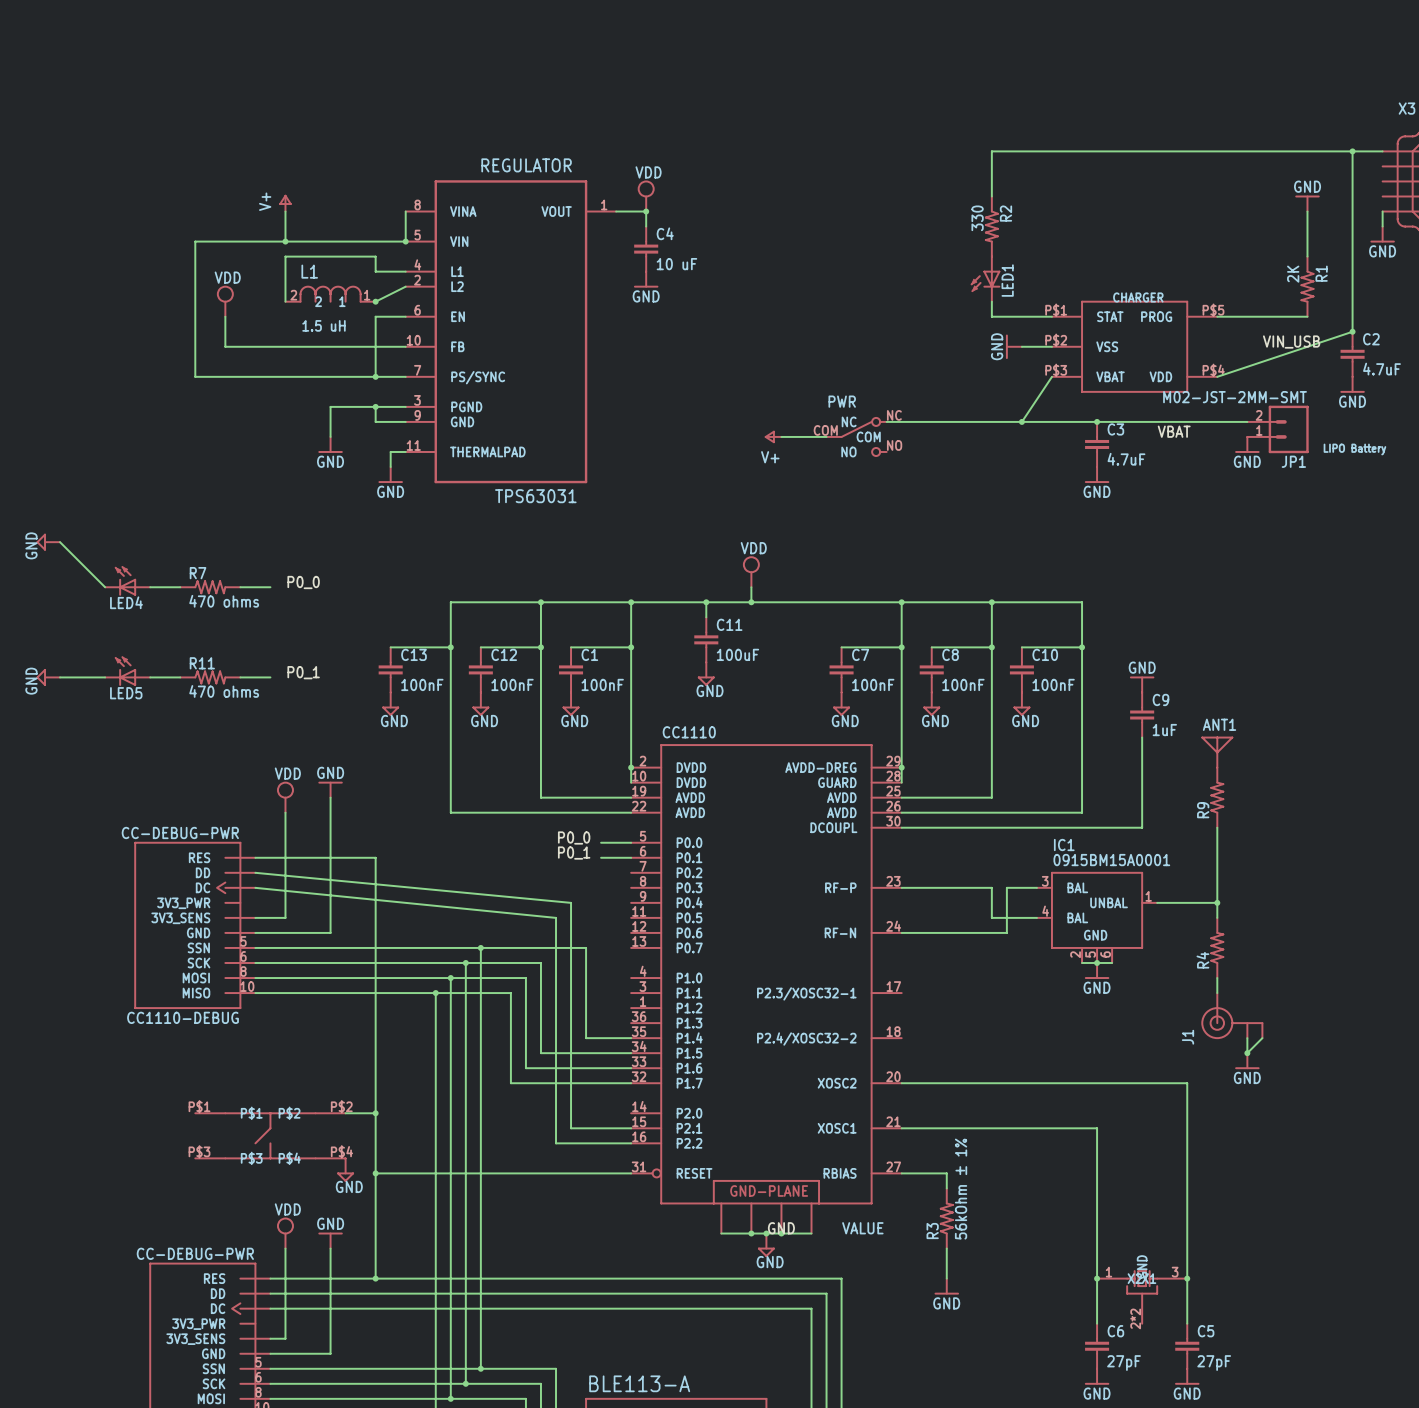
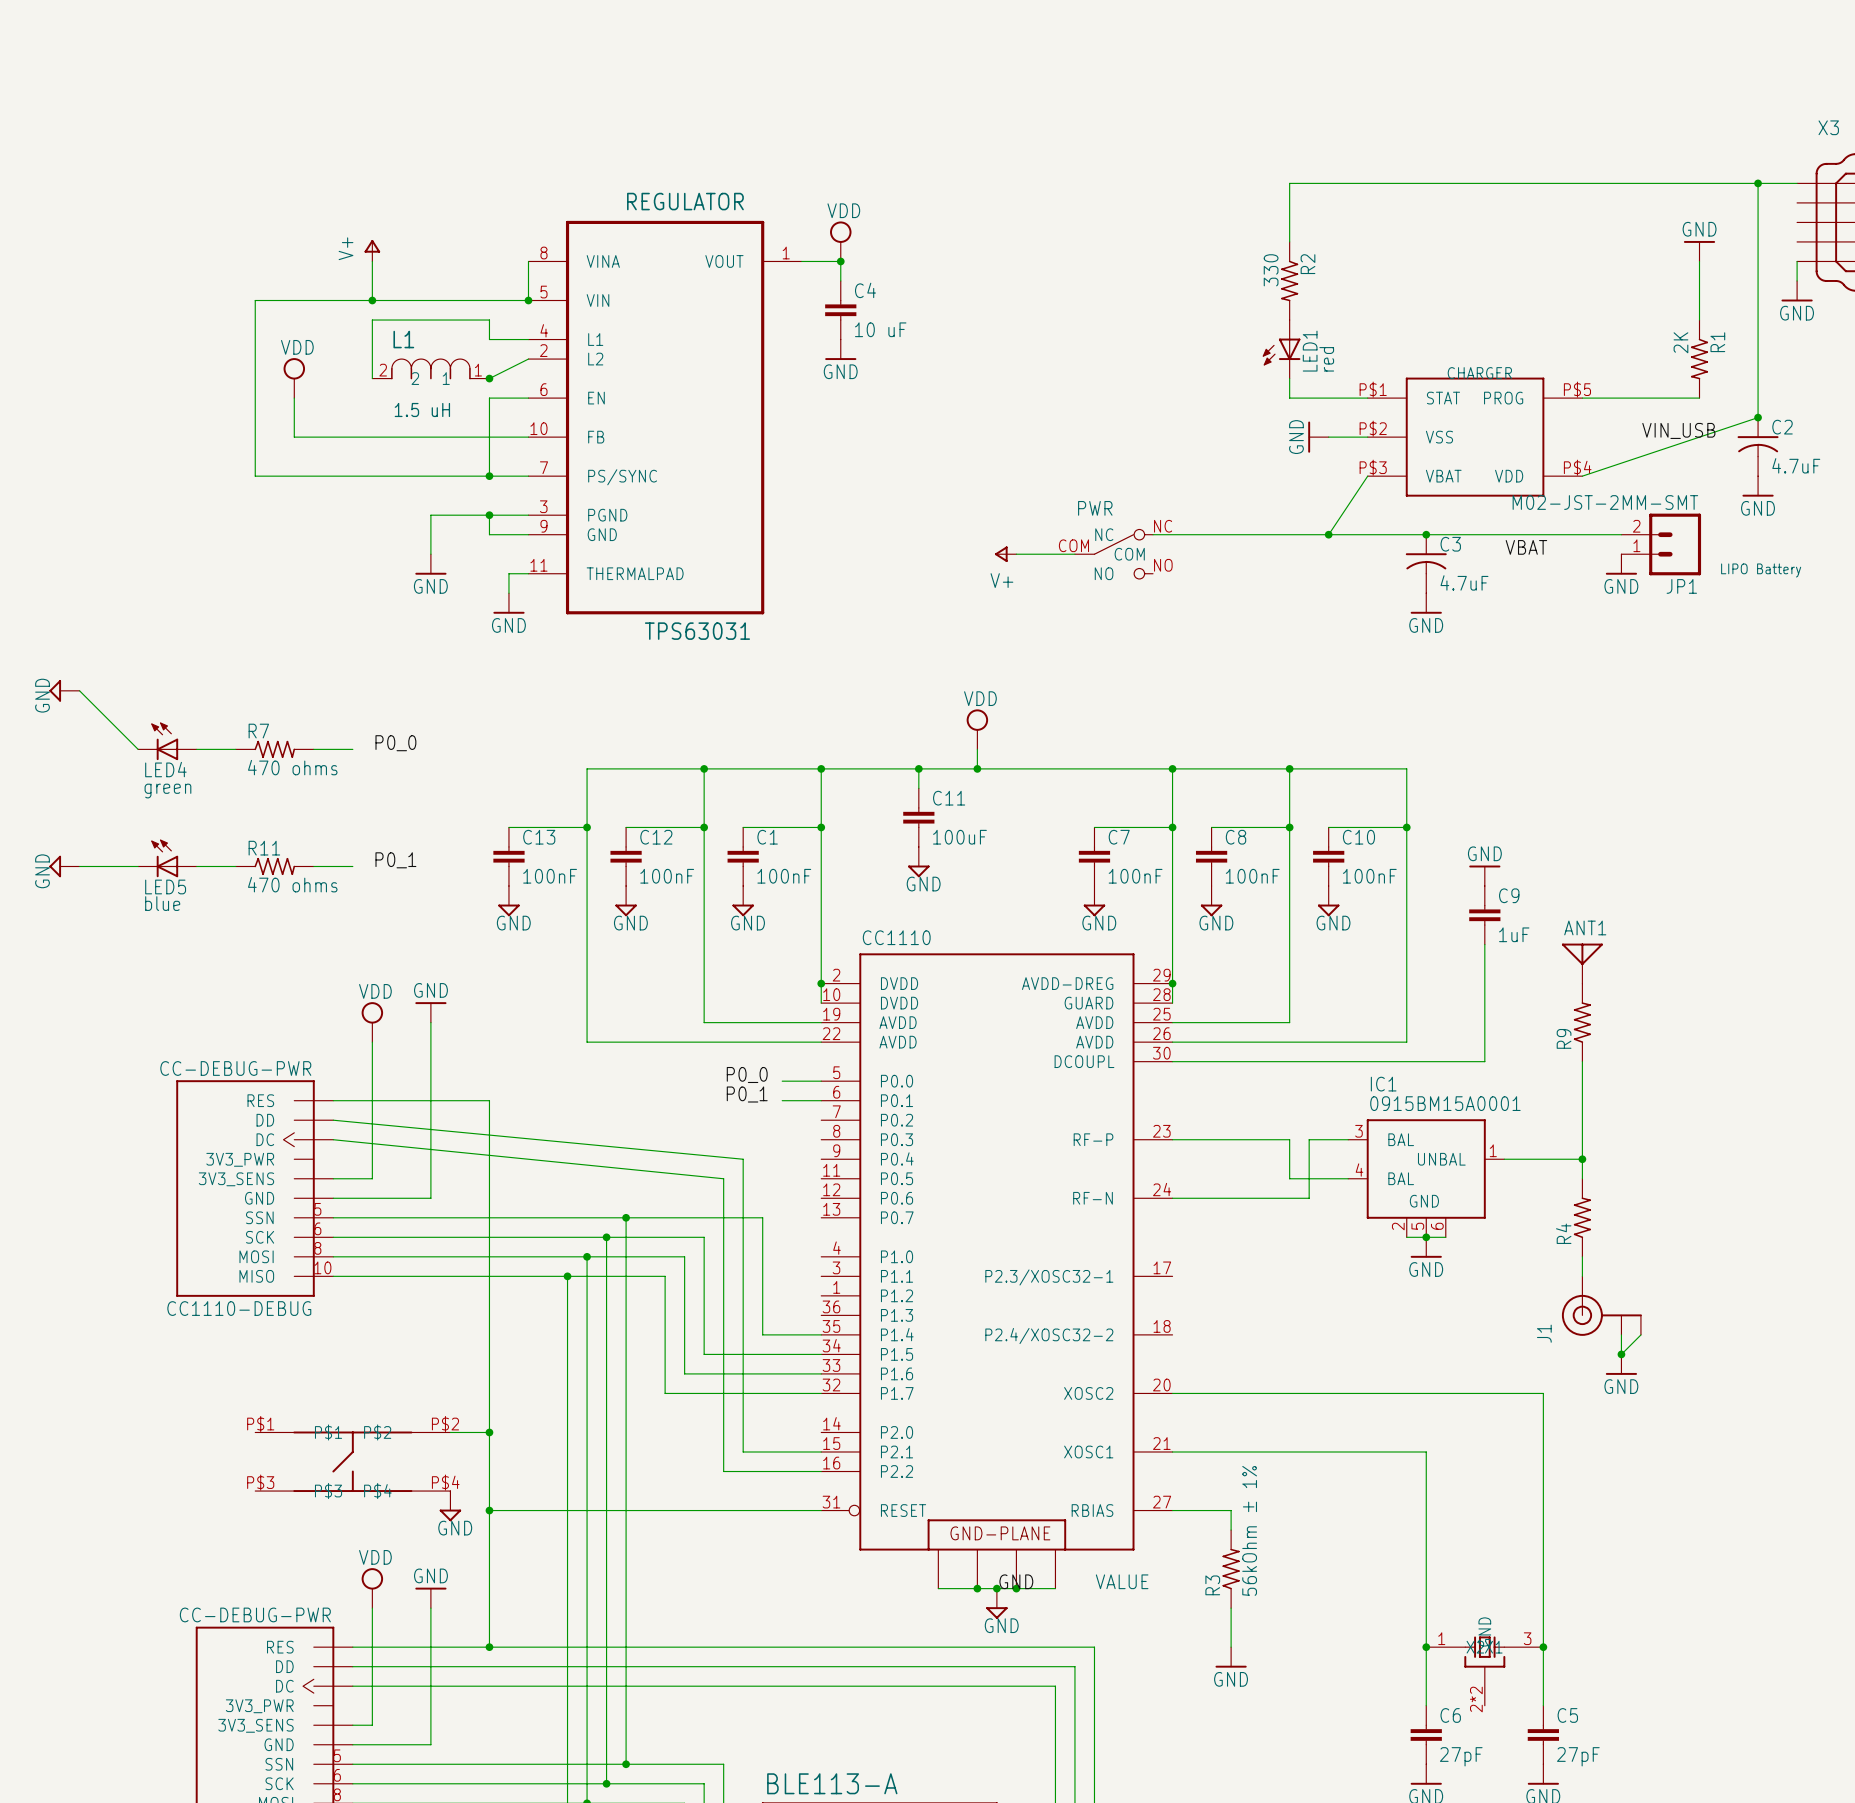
LED1 value: none -> red (1326, 359)
C2 symbol: [1340, 331, 1365, 377] -> [1737, 417, 1779, 477]
C3 symbol: [1085, 421, 1110, 468] -> [1405, 534, 1447, 594]
LED4 value: none -> green (167, 791)
LED5 value: none -> blue (162, 903)

